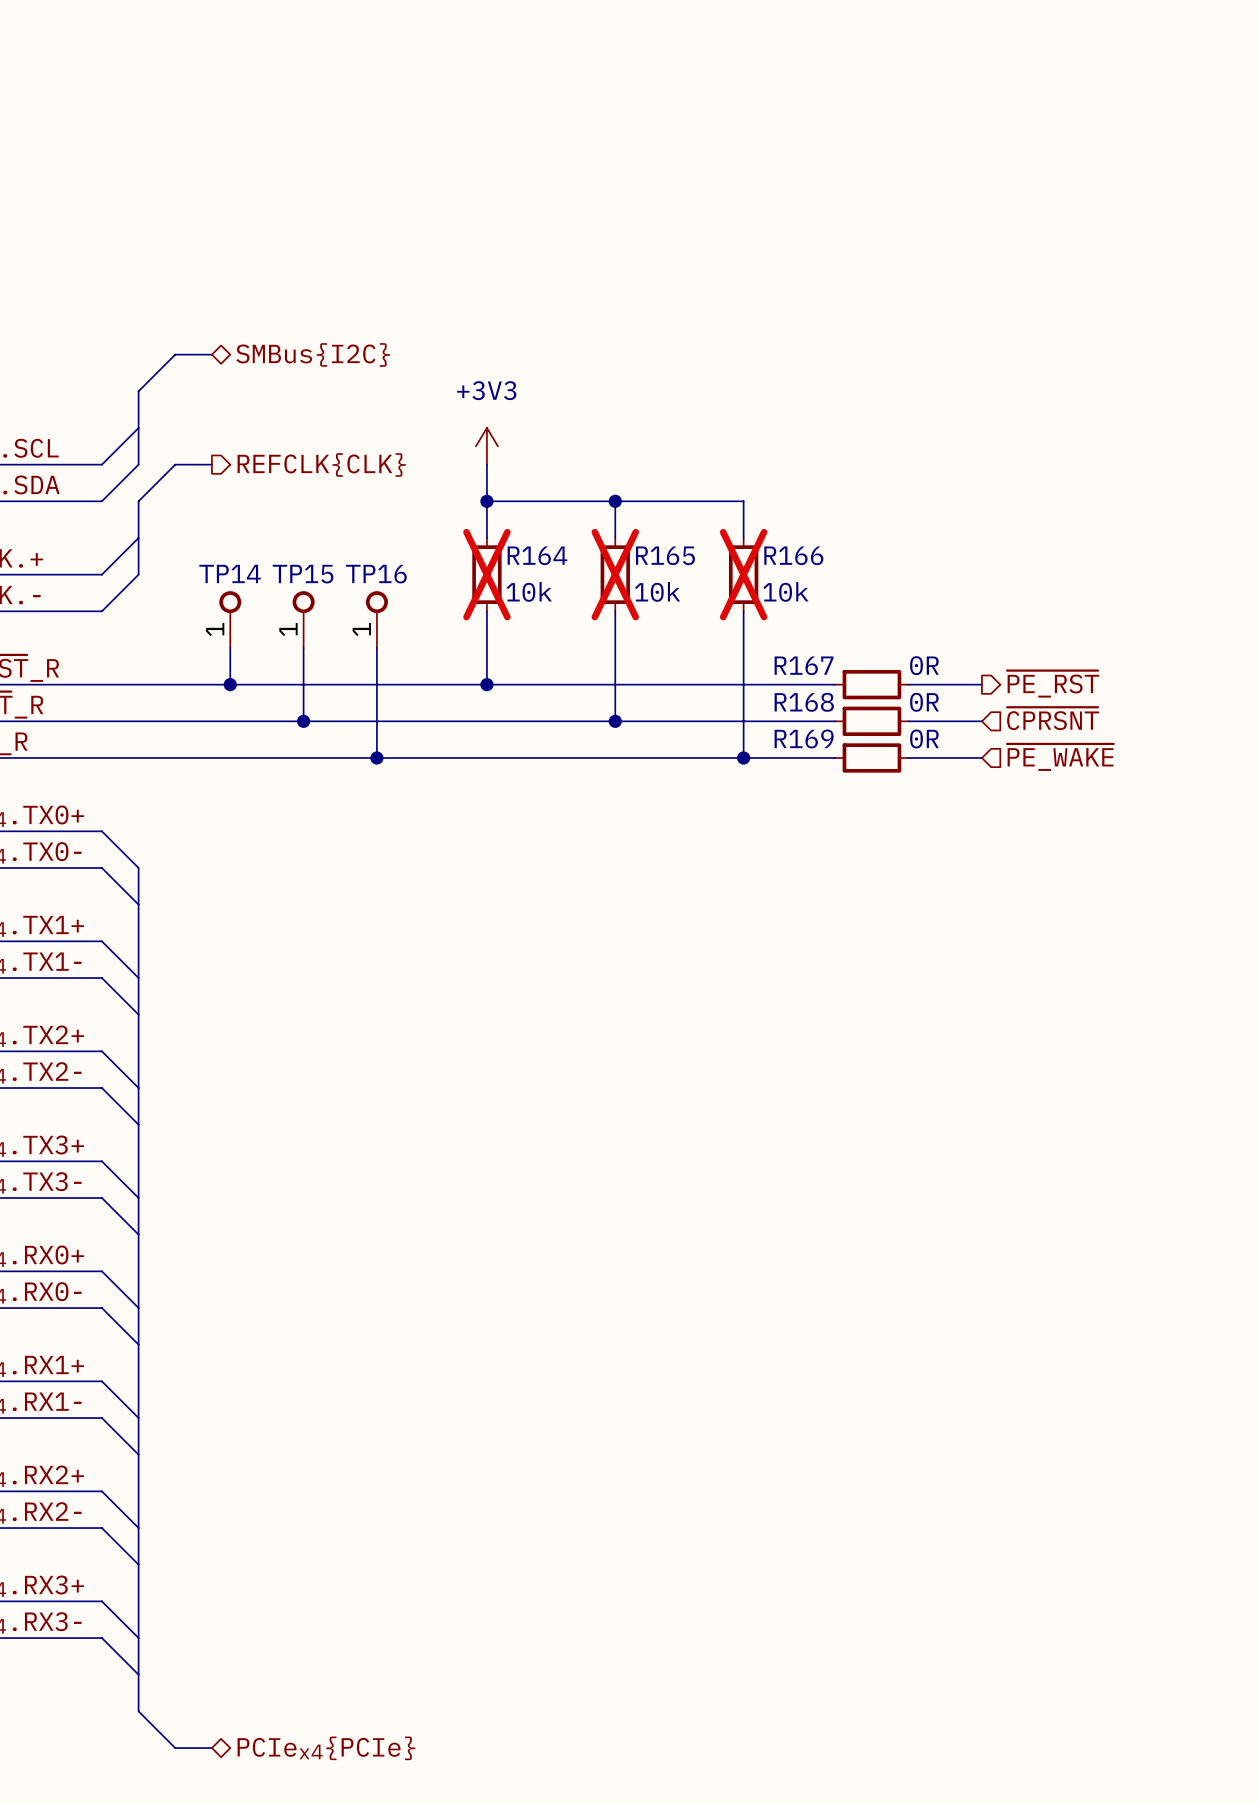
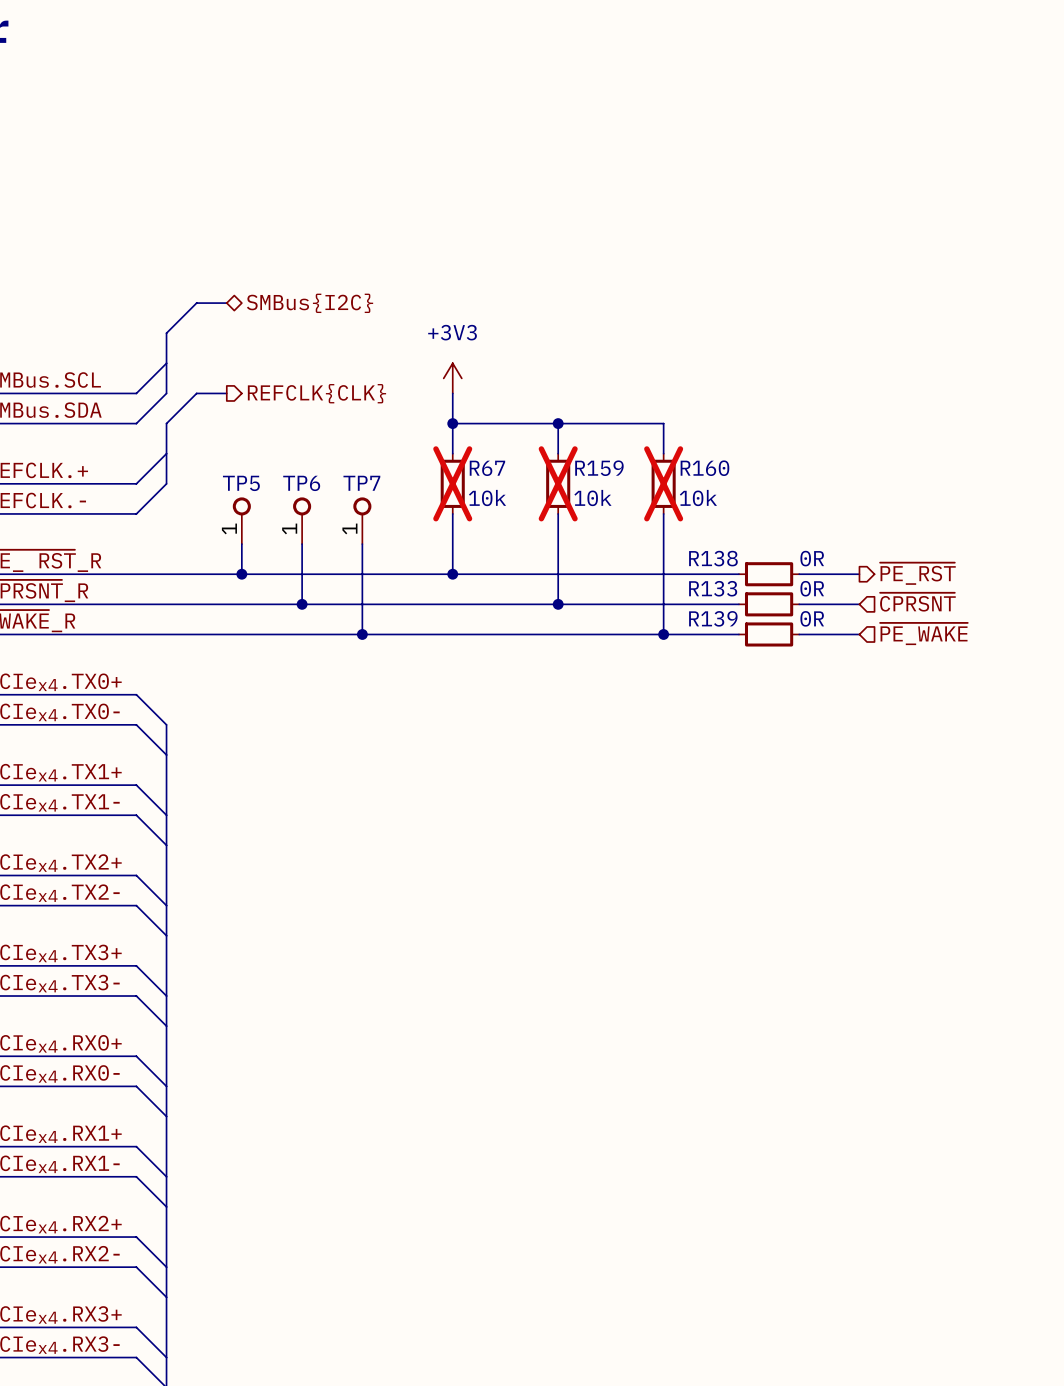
R164 name: R164 (537, 555) -> R67 (487, 468)
R165 name: R165 (665, 555) -> R159 (599, 468)
R166 name: R166 (793, 555) -> R160 (704, 468)
TP14 name: TP14 (230, 573) -> TP5 (241, 483)
TP15 name: TP15 (303, 574) -> TP6 (301, 483)
TP16 name: TP16 (376, 574) -> TP7 (361, 483)
R167 name: R167 (804, 665) -> R138 (713, 558)
R168 name: R168 (804, 702) -> R133 (713, 588)
R169 name: R169 (804, 738) -> R139 (713, 618)

